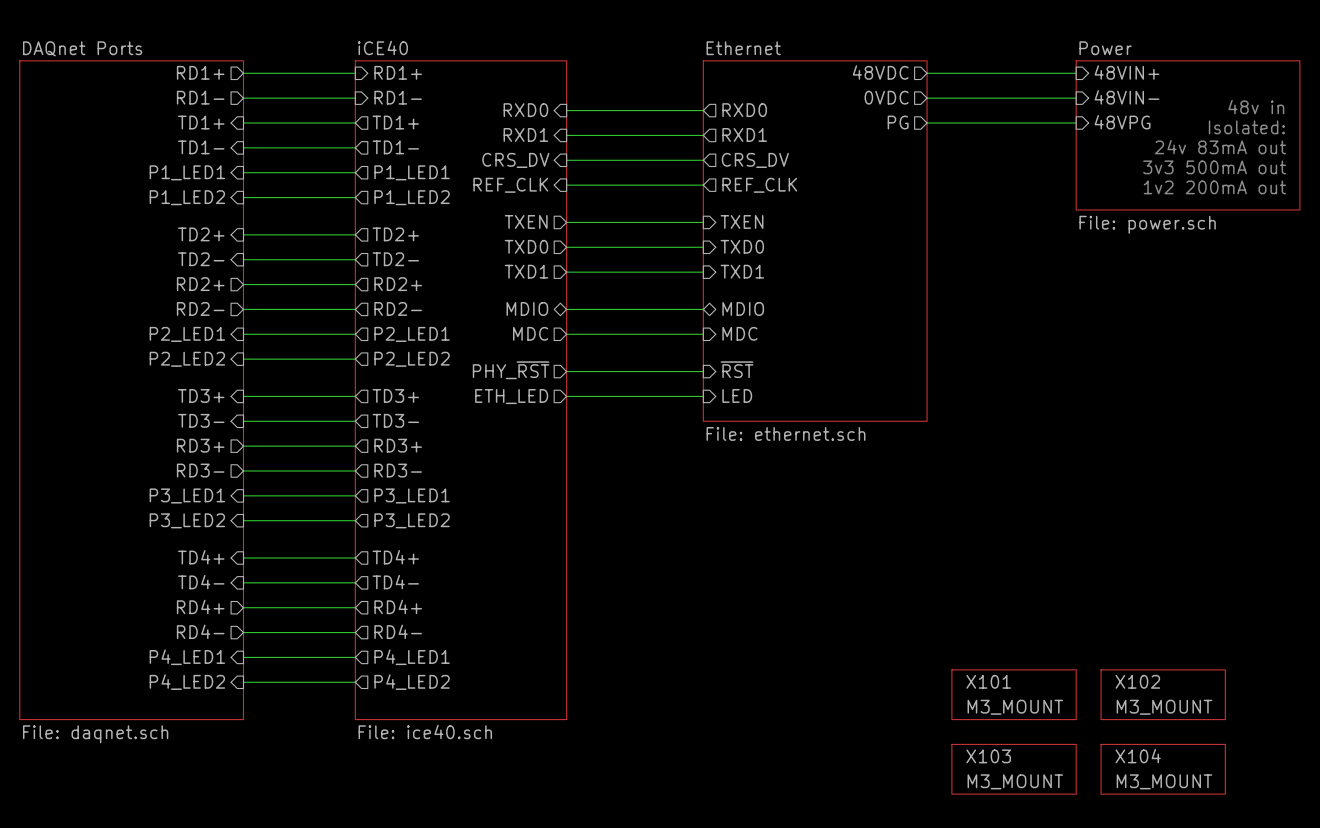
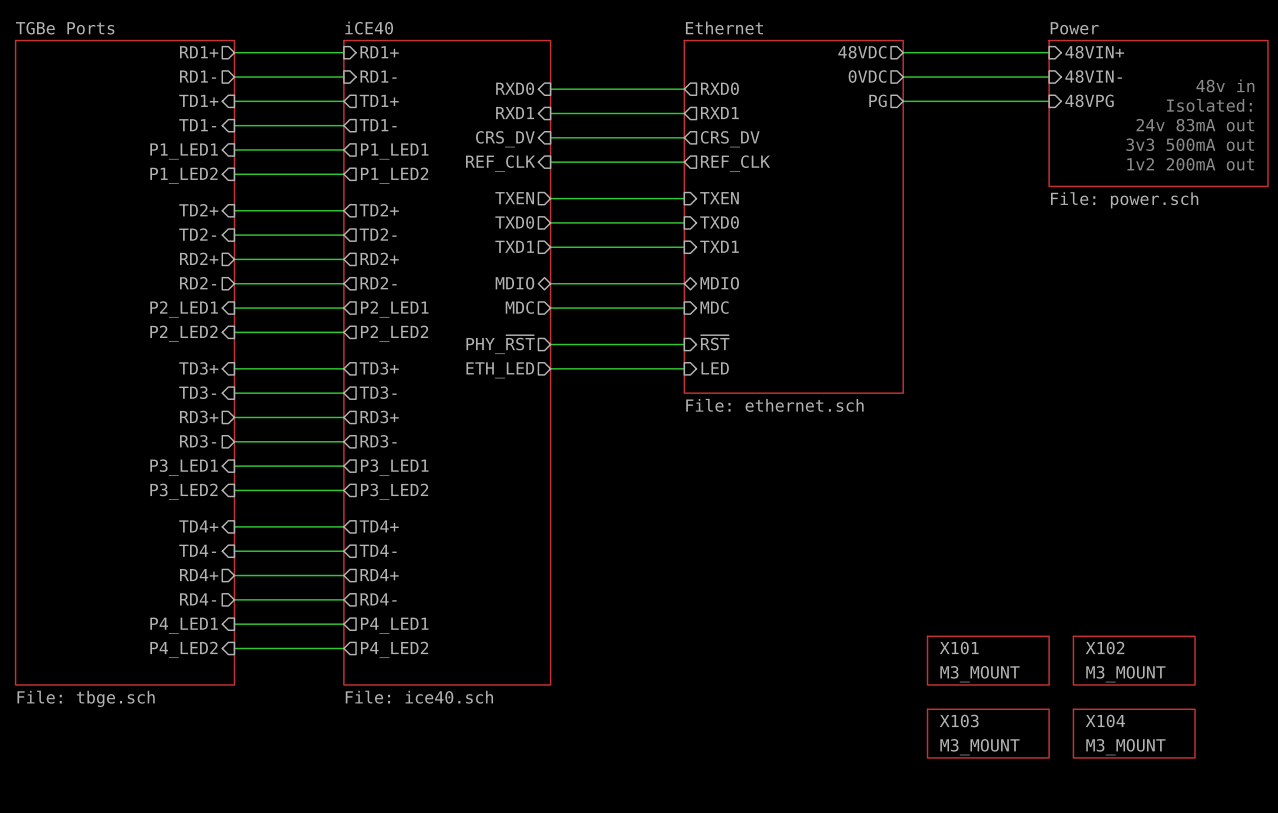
sheet DAQnet Ports name: DAQnet Ports (82, 48) -> TGBe Ports (65, 28)
sheet DAQnet Ports value: File: daqnet.sch (95, 734) -> File: tbge.sch (86, 698)

